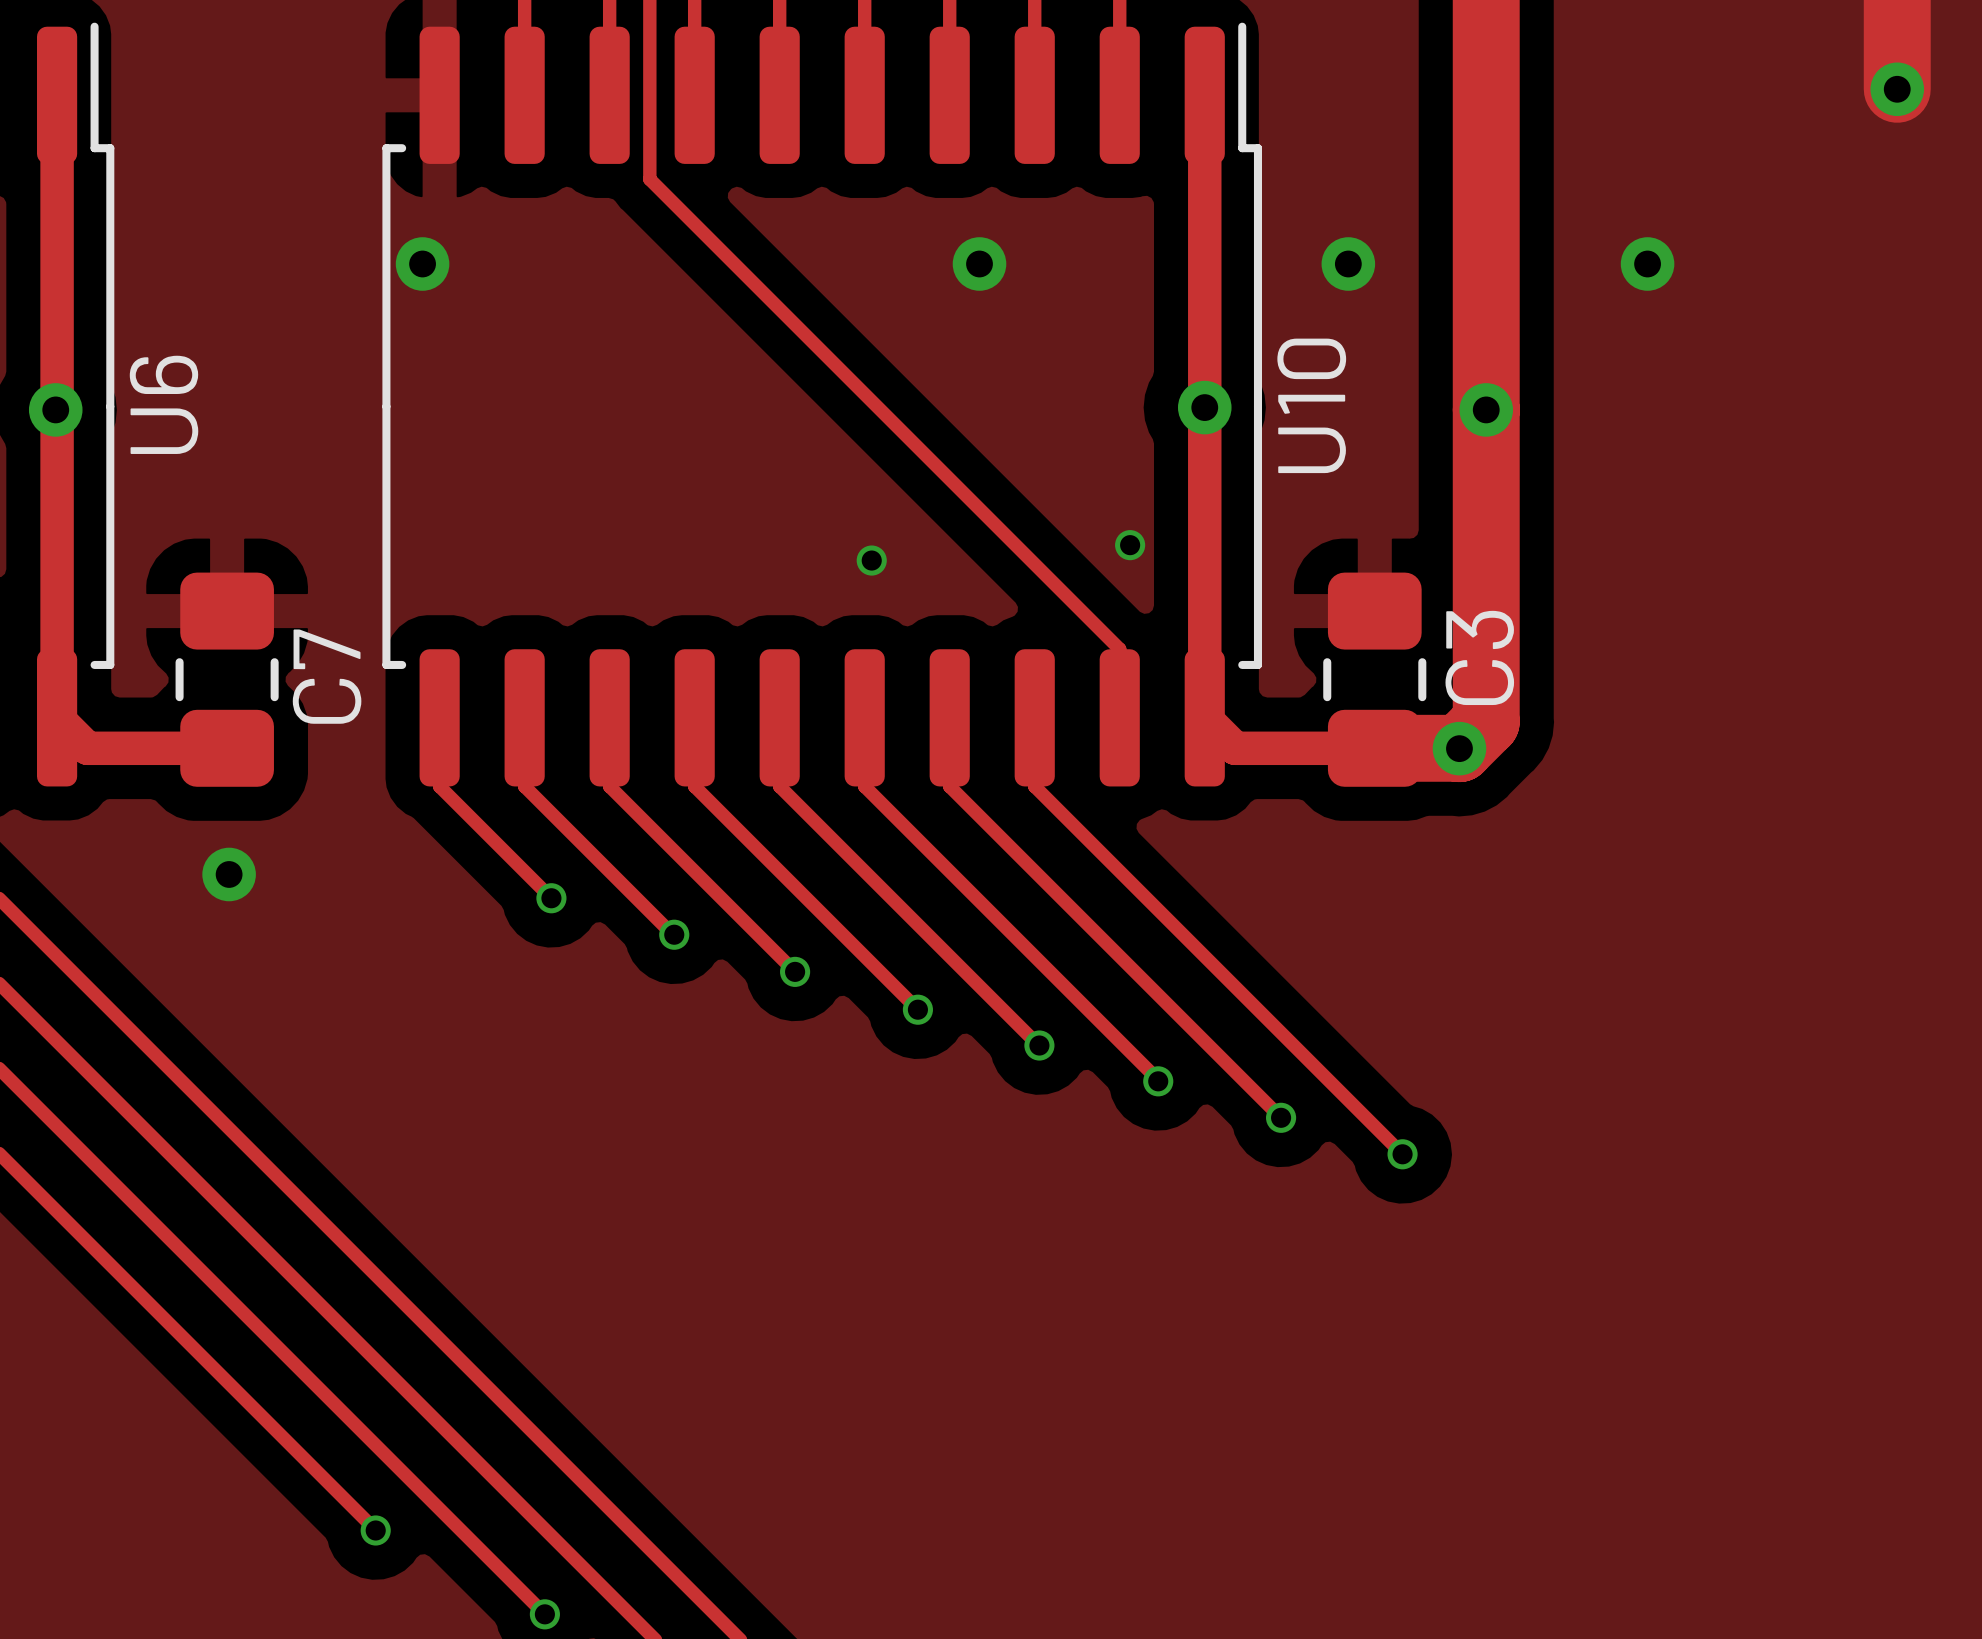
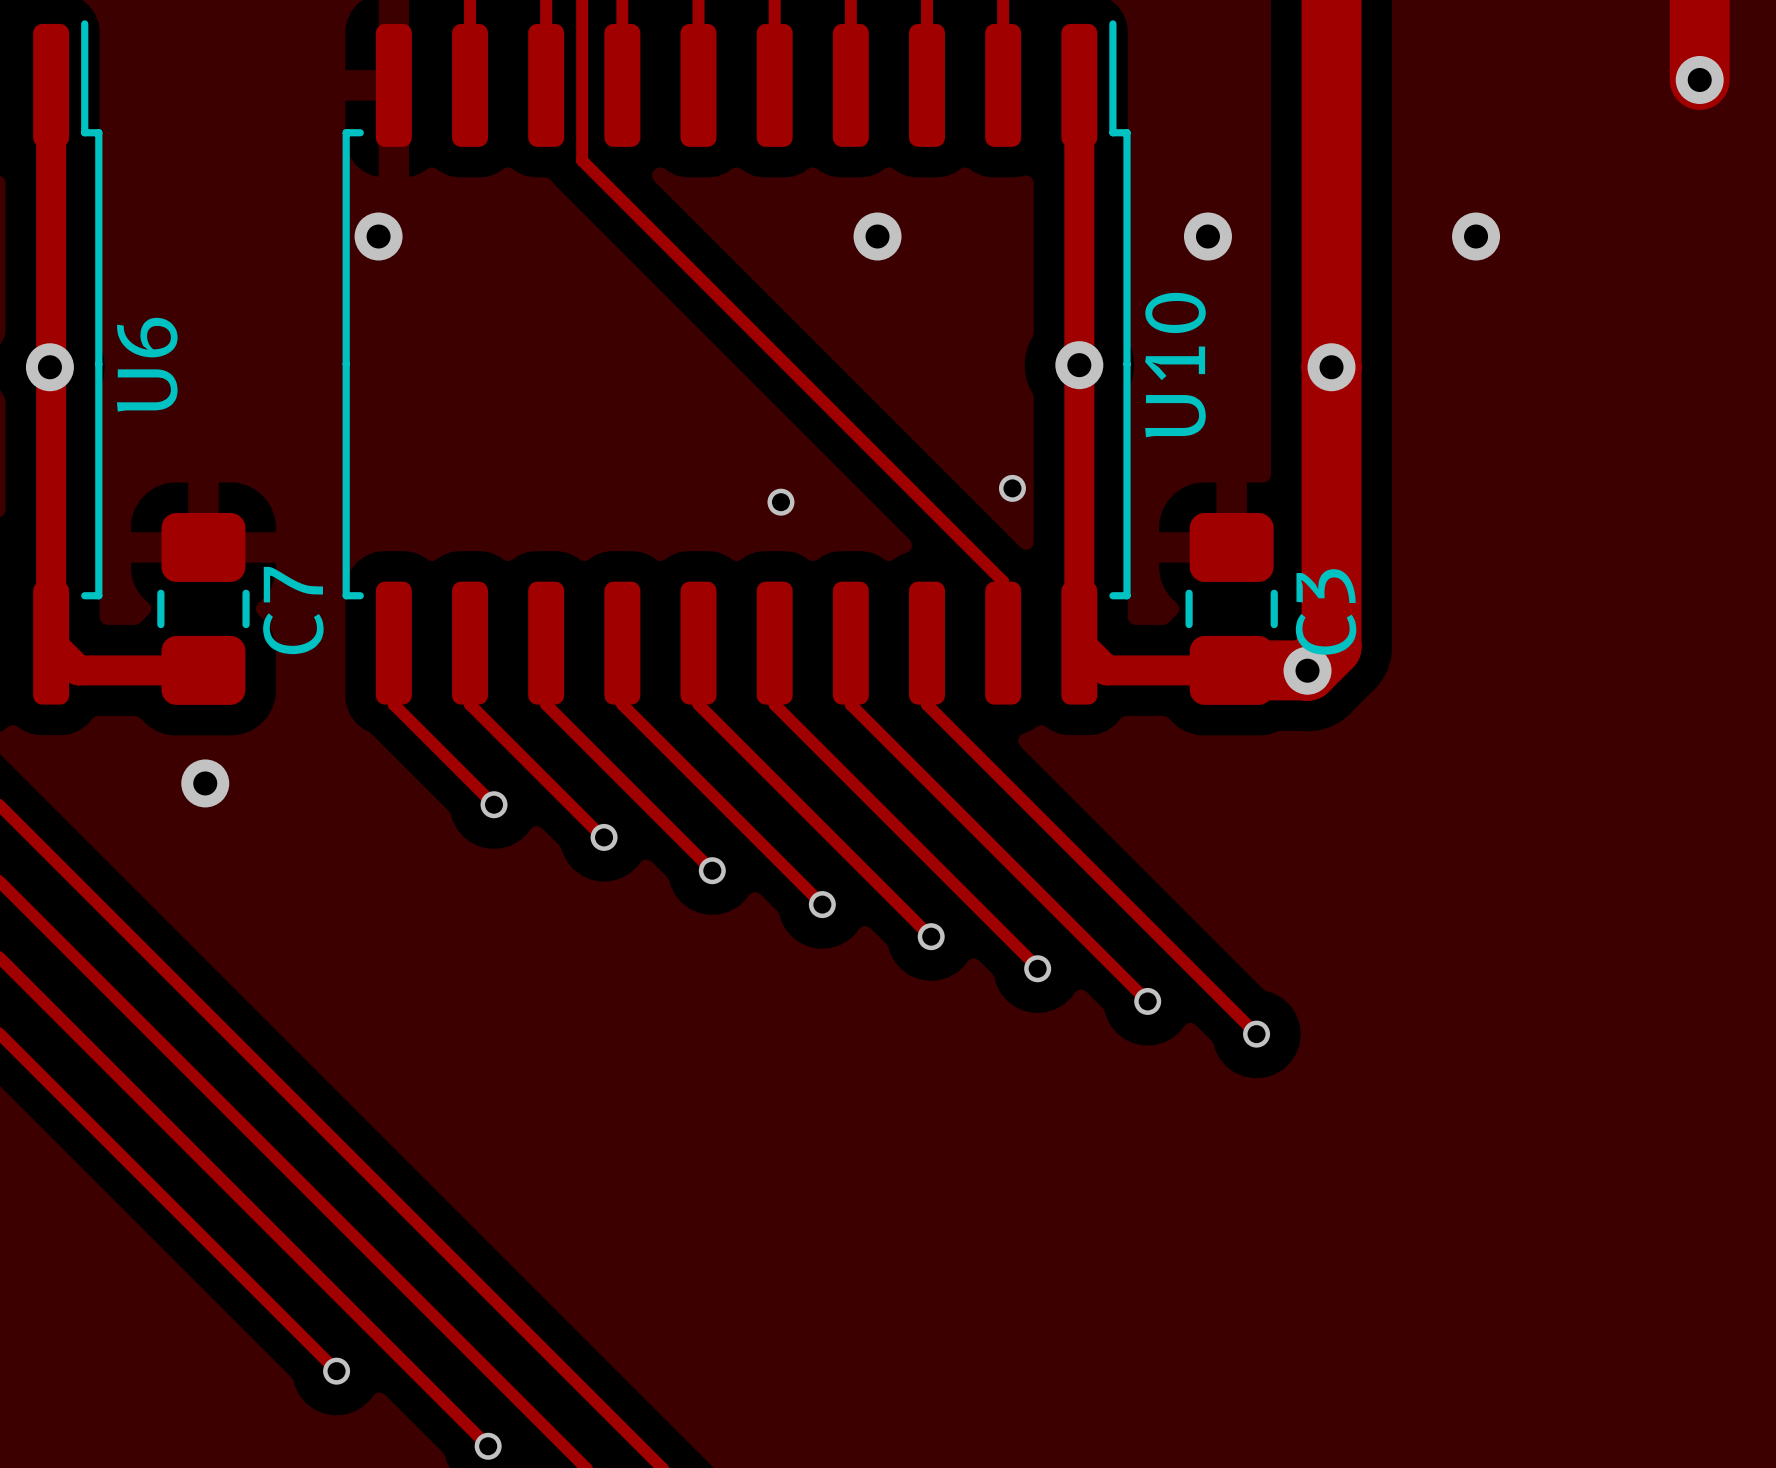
C3 name position: C3 (1479, 657) -> C3 (1326, 611)

